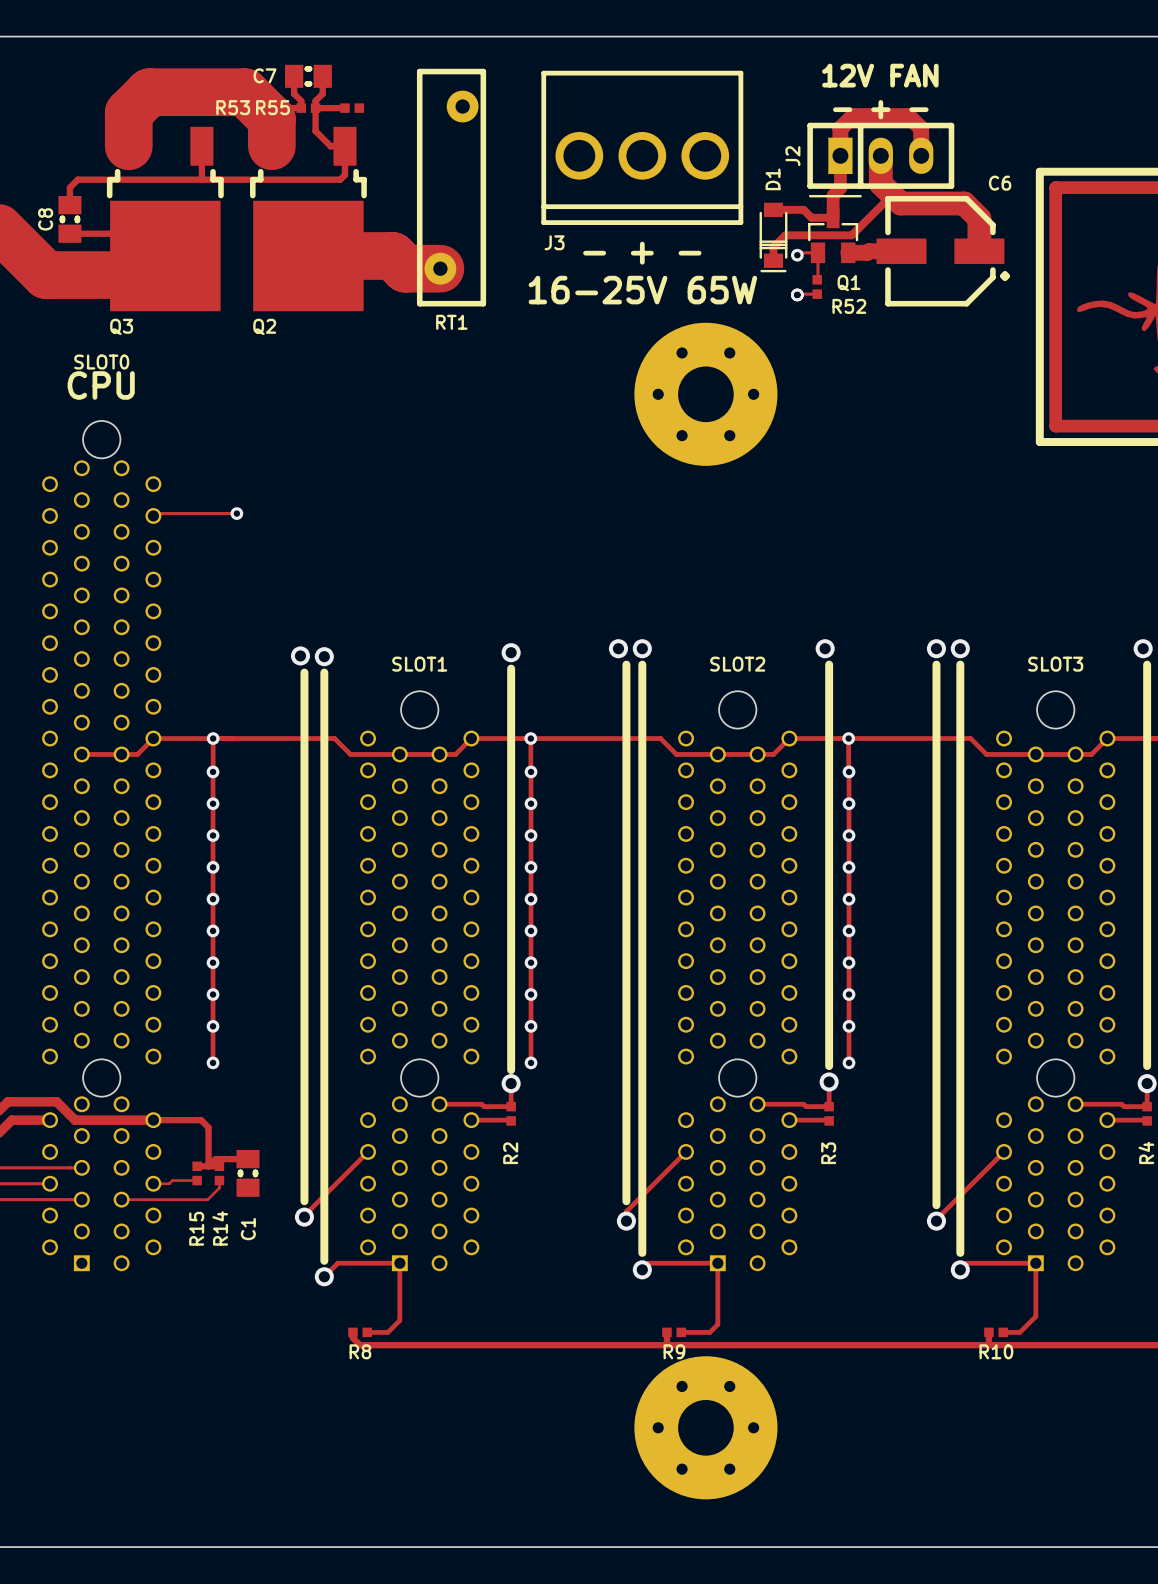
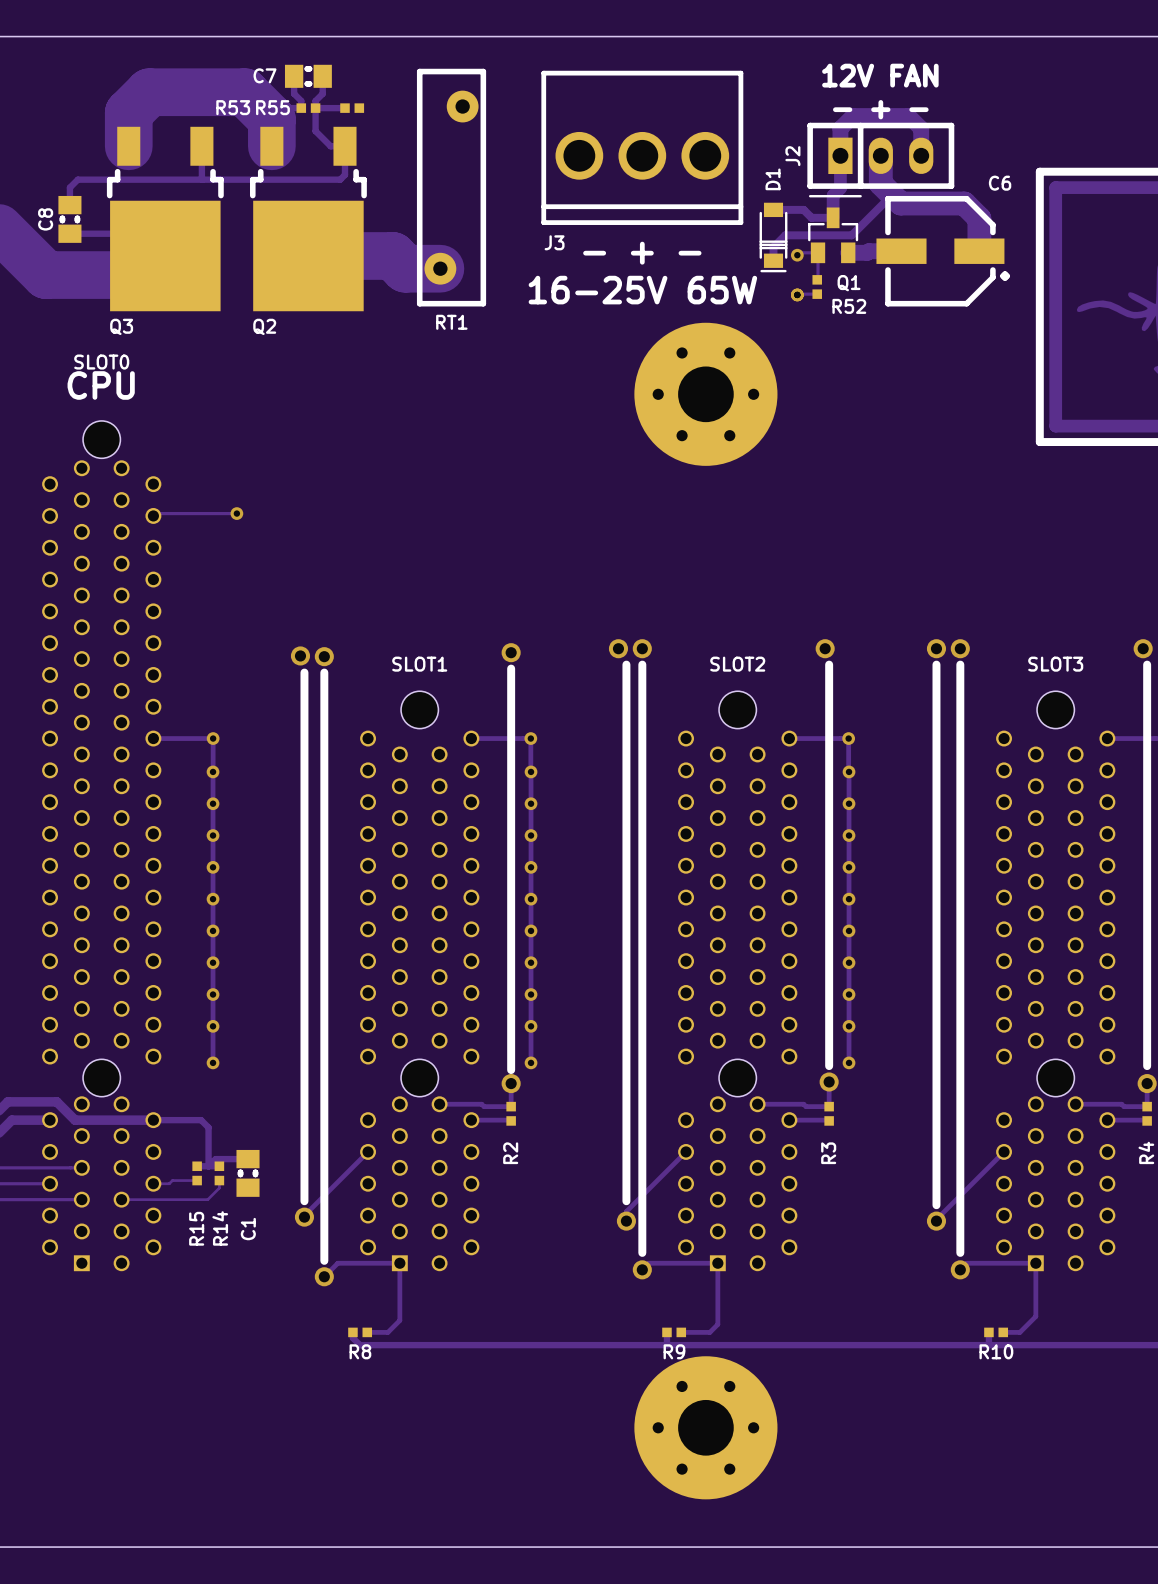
track: (153, 738) (137, 754) (81, 754) -> none
track: (213, 738) (334, 738) (350, 754) (455, 754) (471, 738) -> none
track: (530, 738) (660, 738) (676, 754) (773, 754) (789, 738) -> none
track: (848, 738) (970, 738) (986, 754) (1091, 754) (1107, 738) -> none

